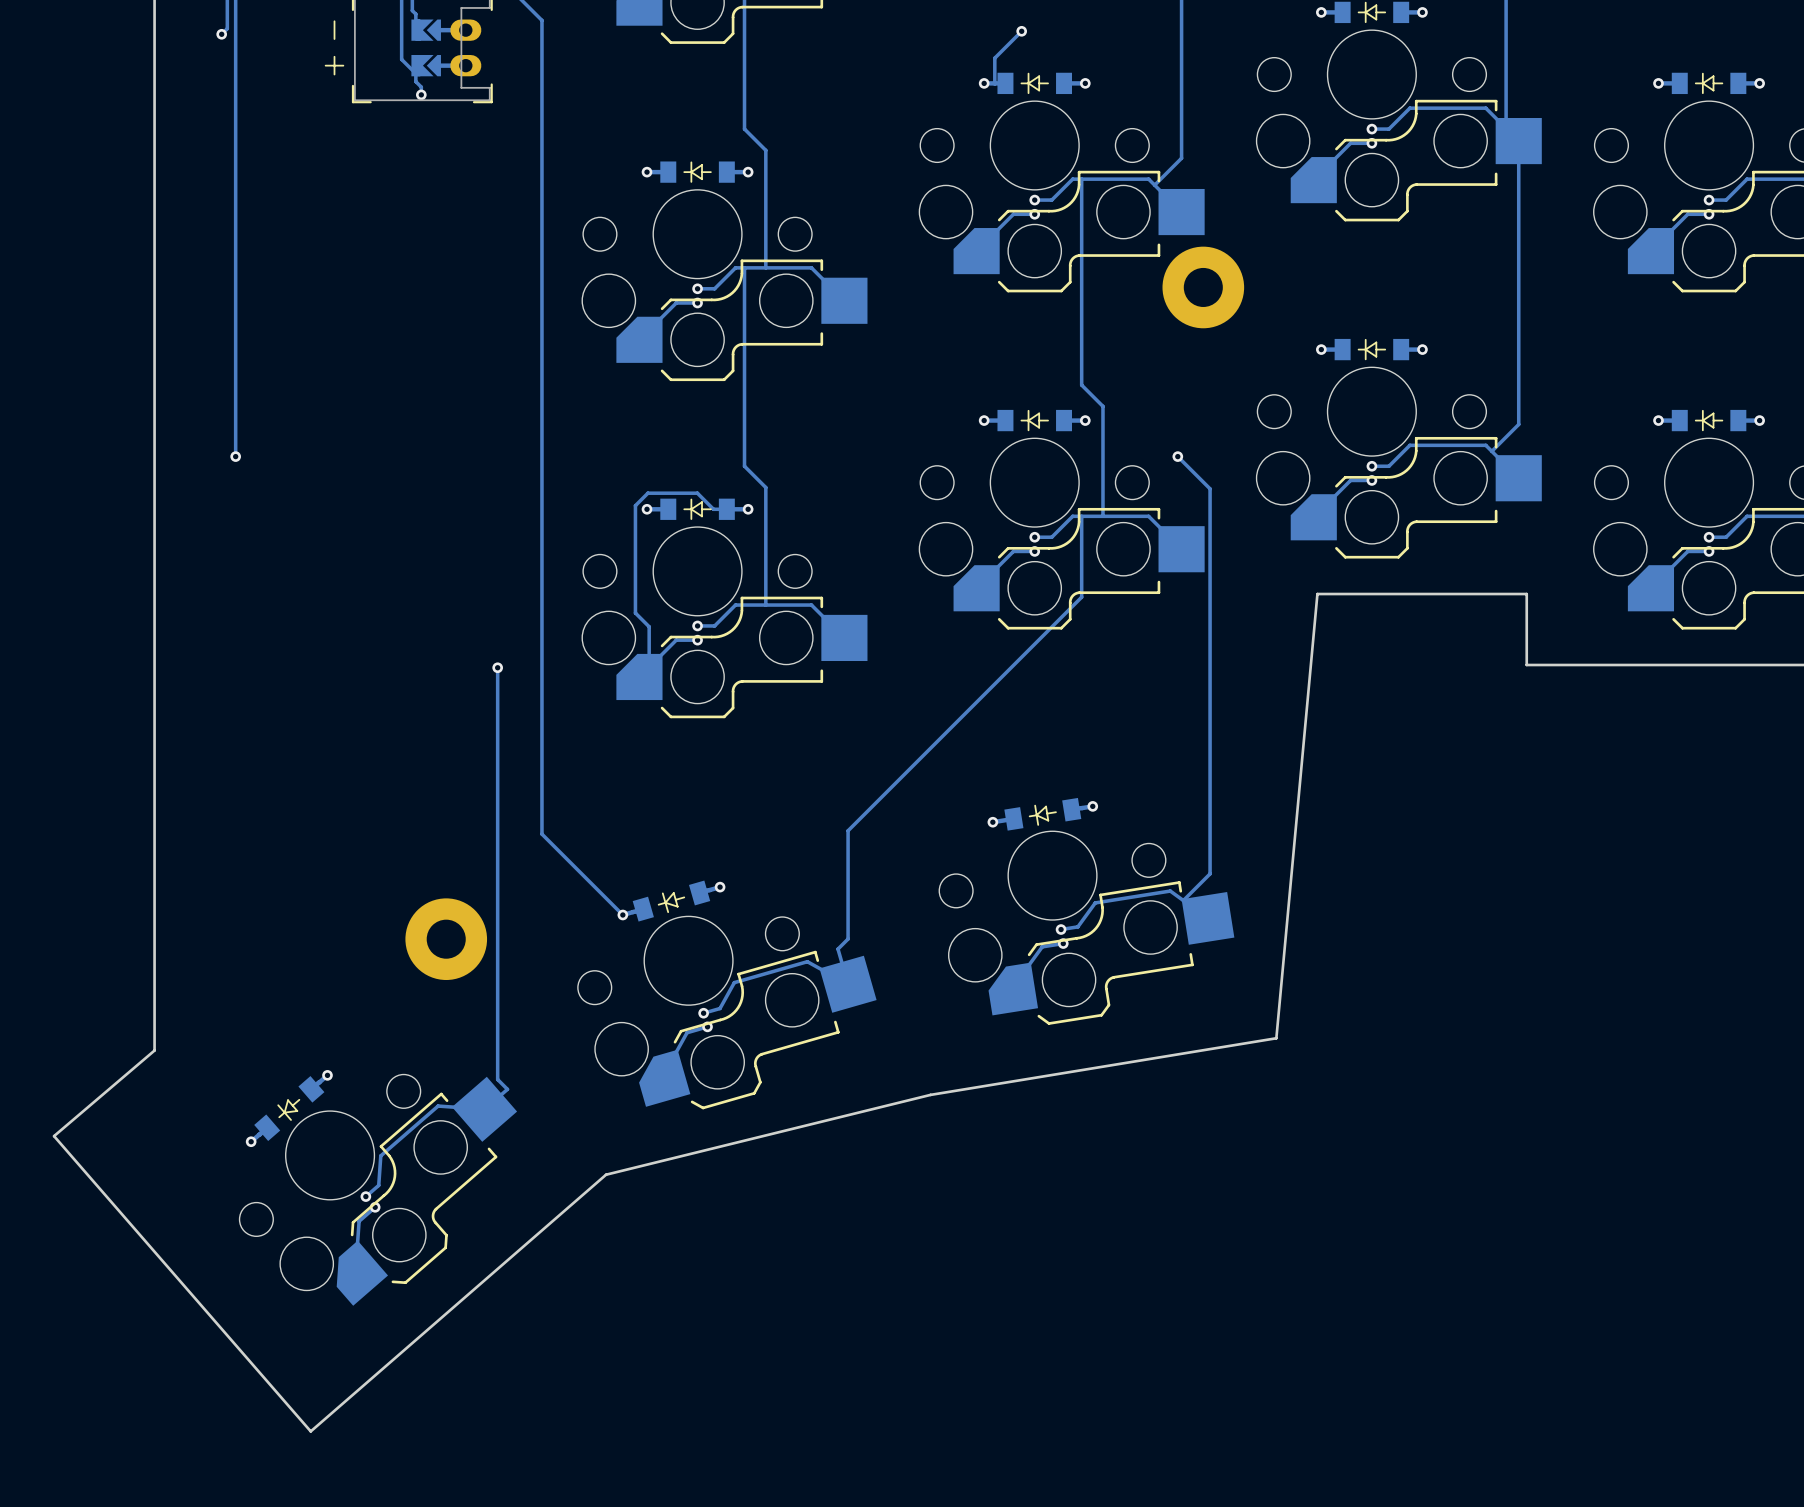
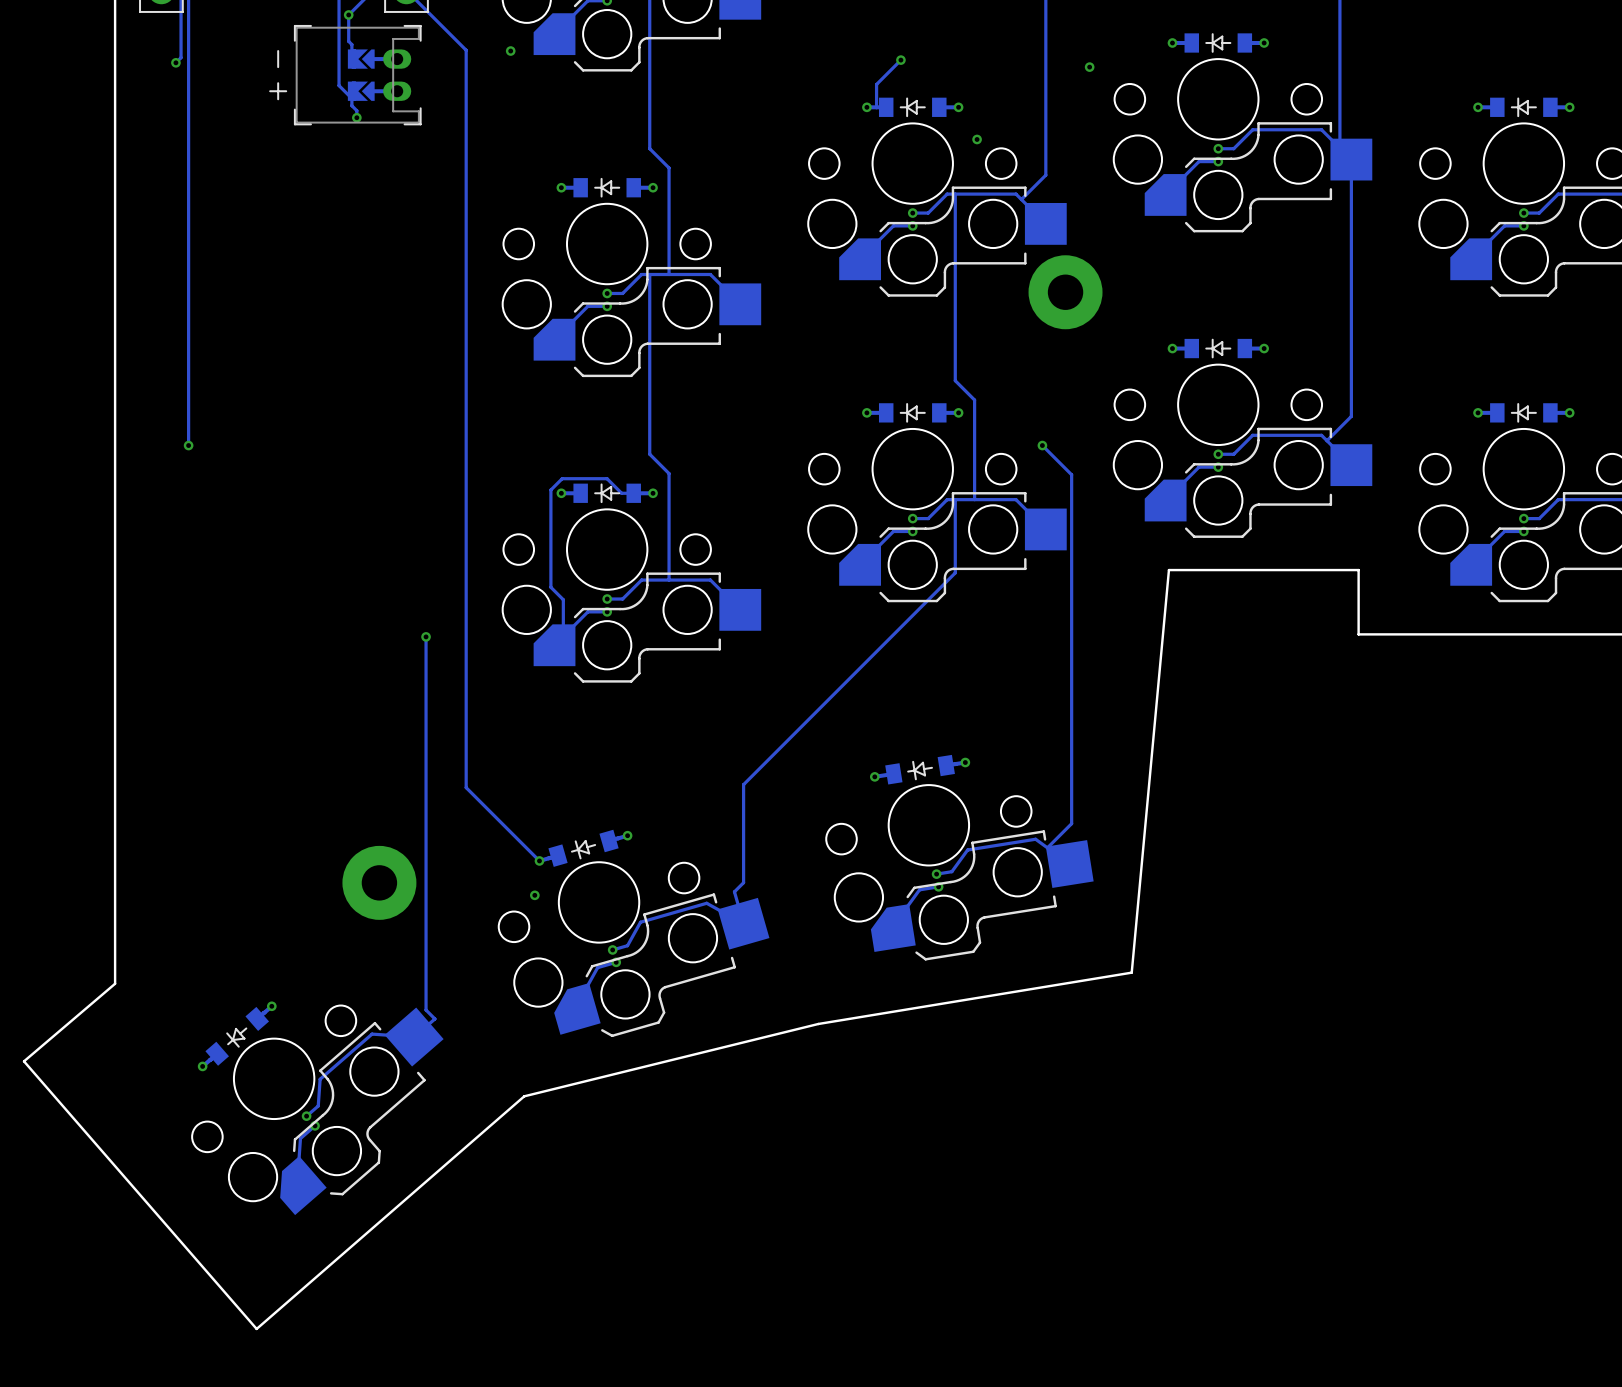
via: none -> (510, 51)
via: none -> (1089, 67)
via: none -> (977, 139)
via: none -> (534, 895)

